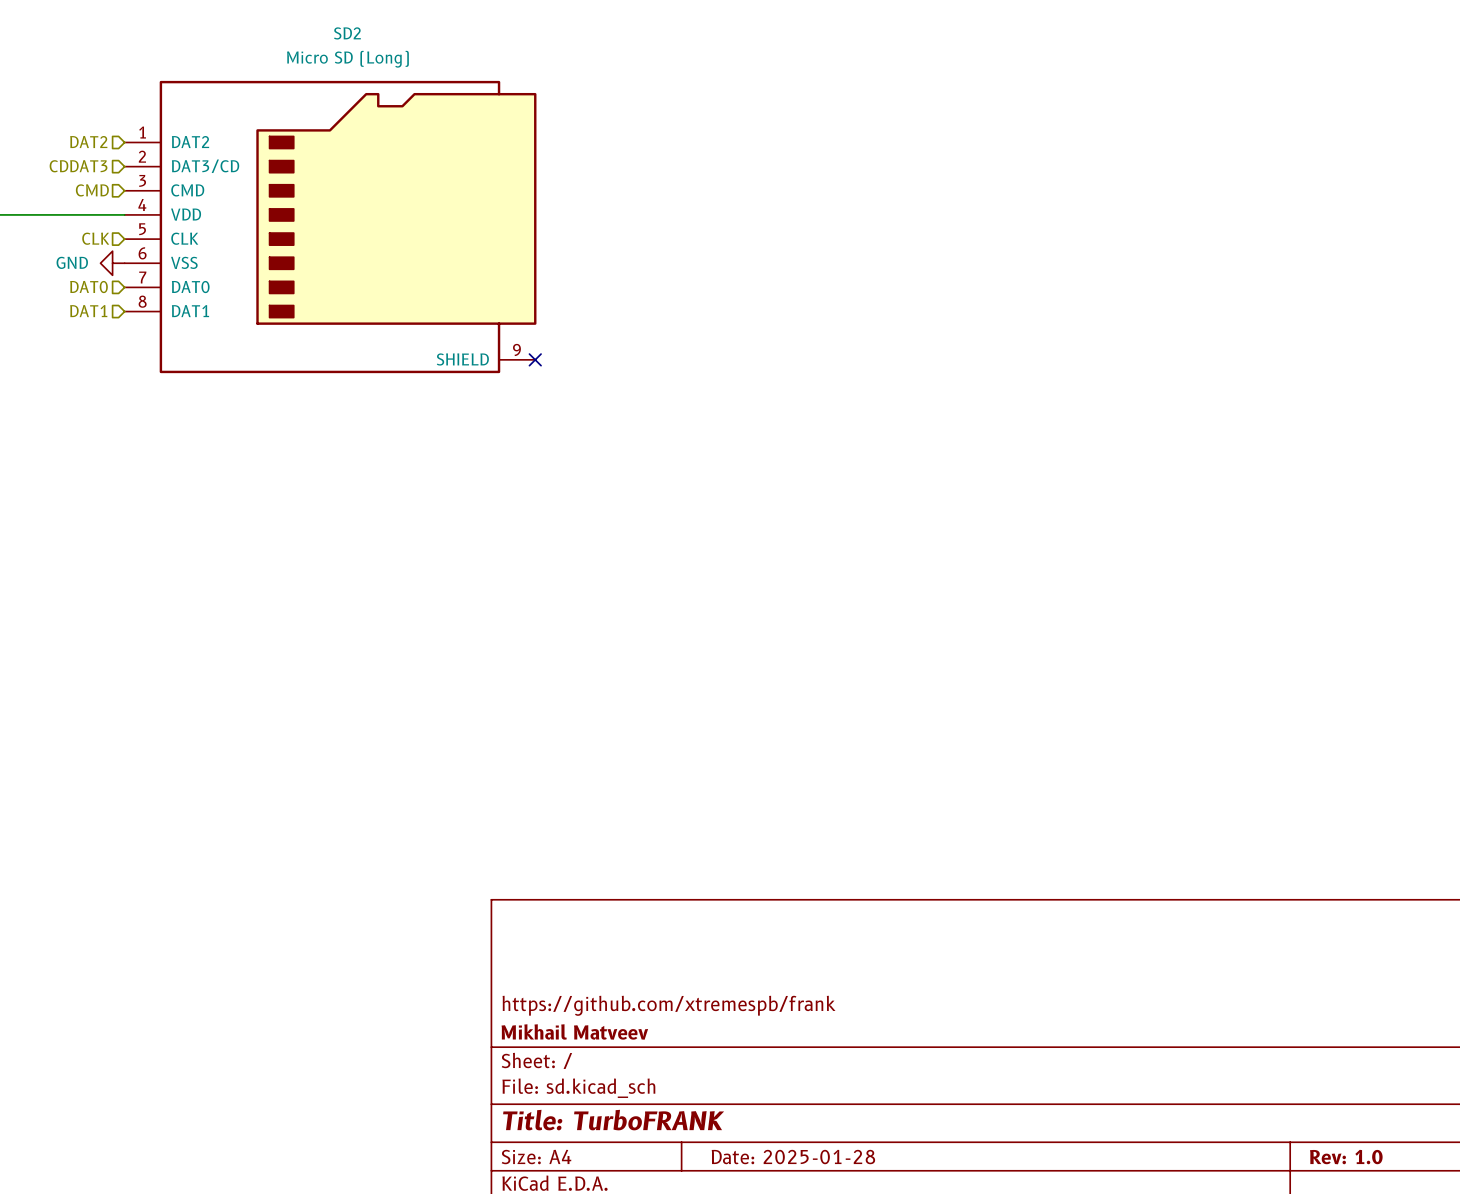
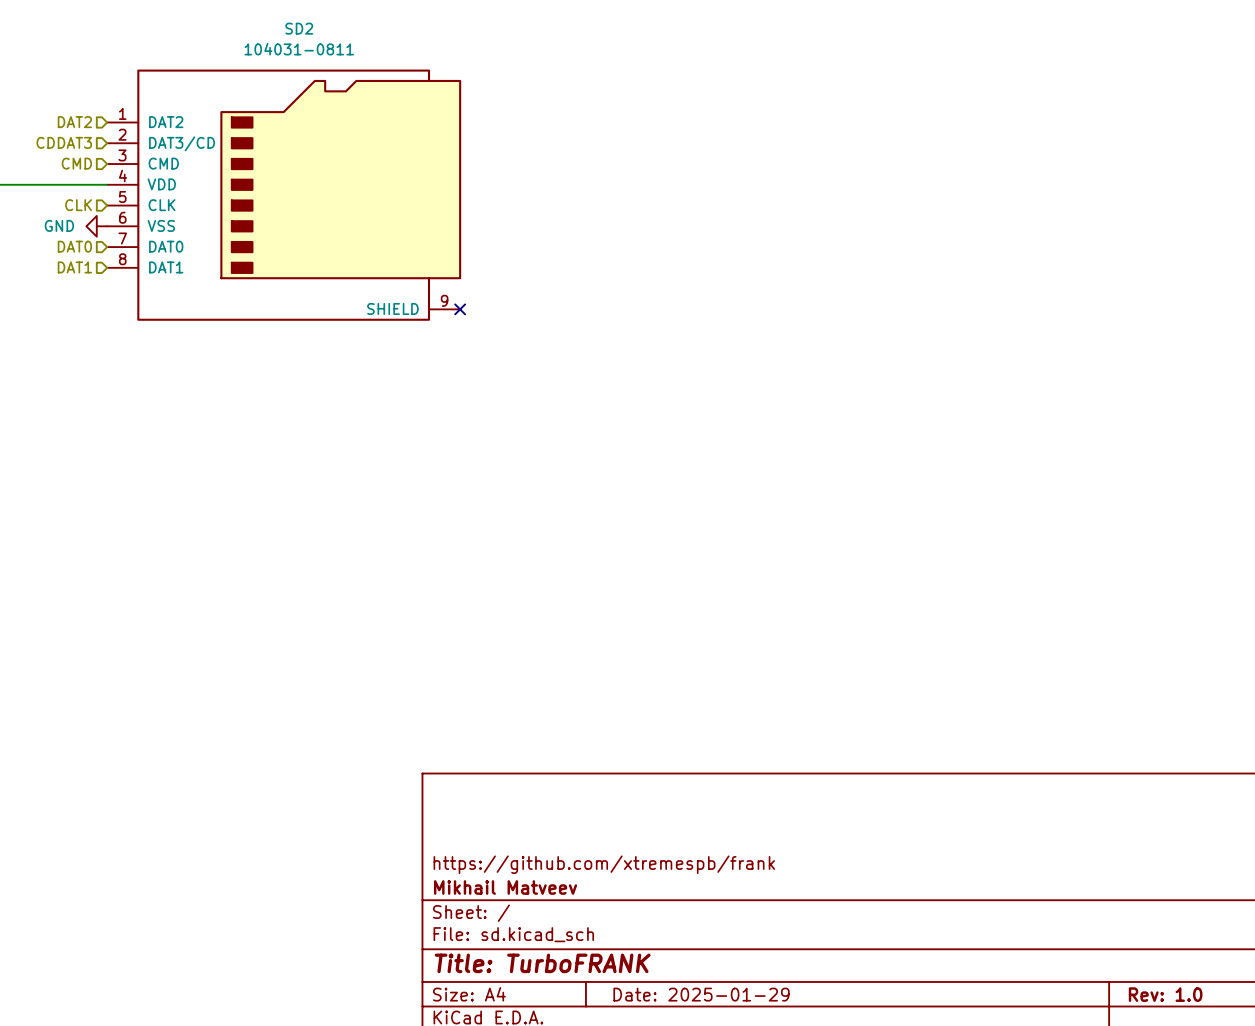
SD2 value: Micro SD (Long) (347, 59) -> 104031-0811 (299, 49)
title block: Date: 2025-01-28 (793, 1157) -> Date: 2025-01-29 (701, 994)

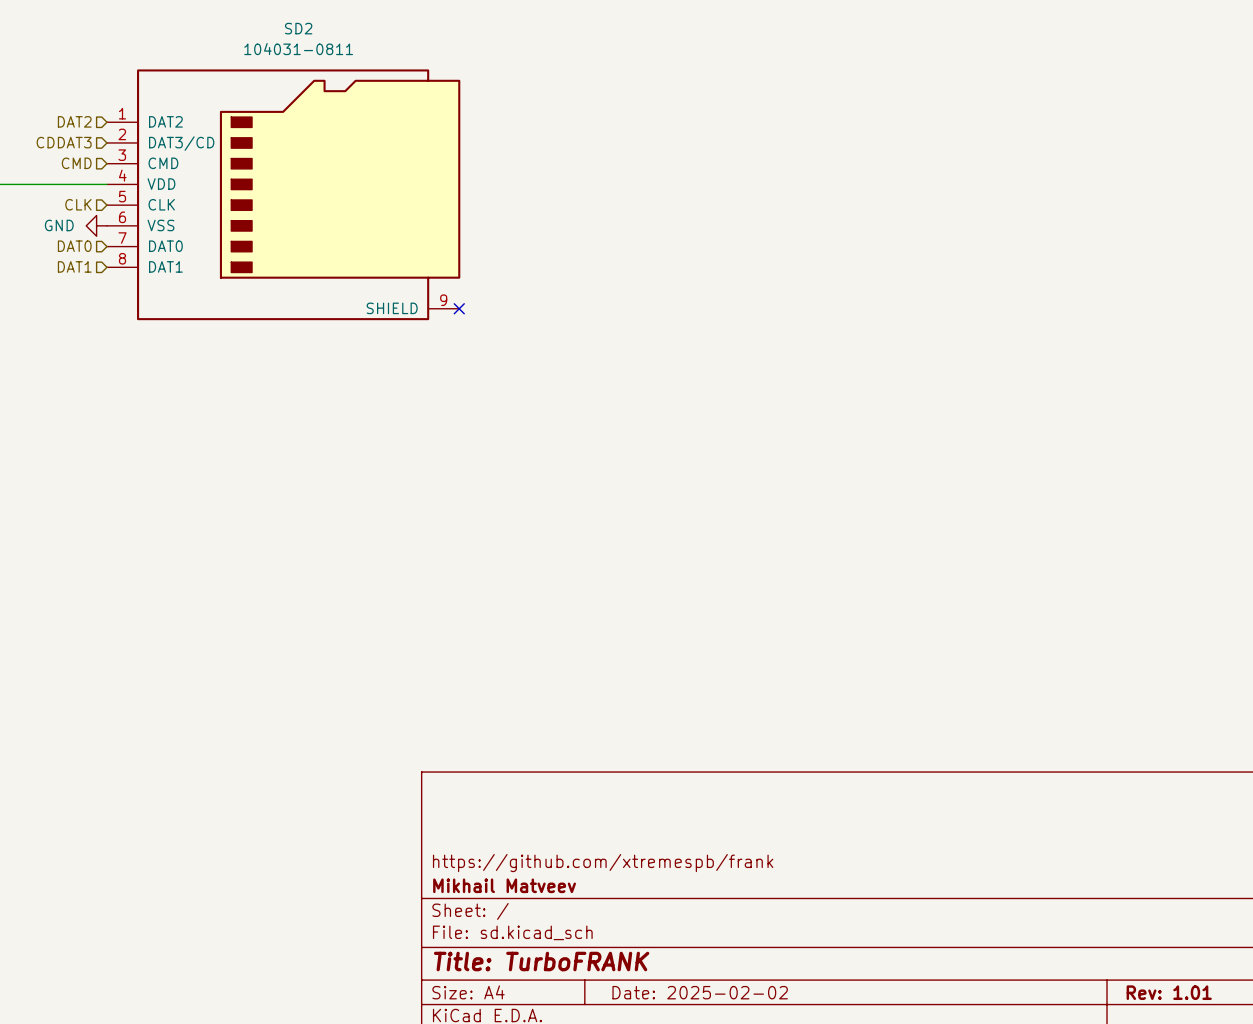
title block: Date: 2025-01-29 (701, 994) -> Date: 2025-02-02 (700, 992)
title block: Rev: 1.0 (1165, 994) -> Rev: 1.01 (1169, 992)

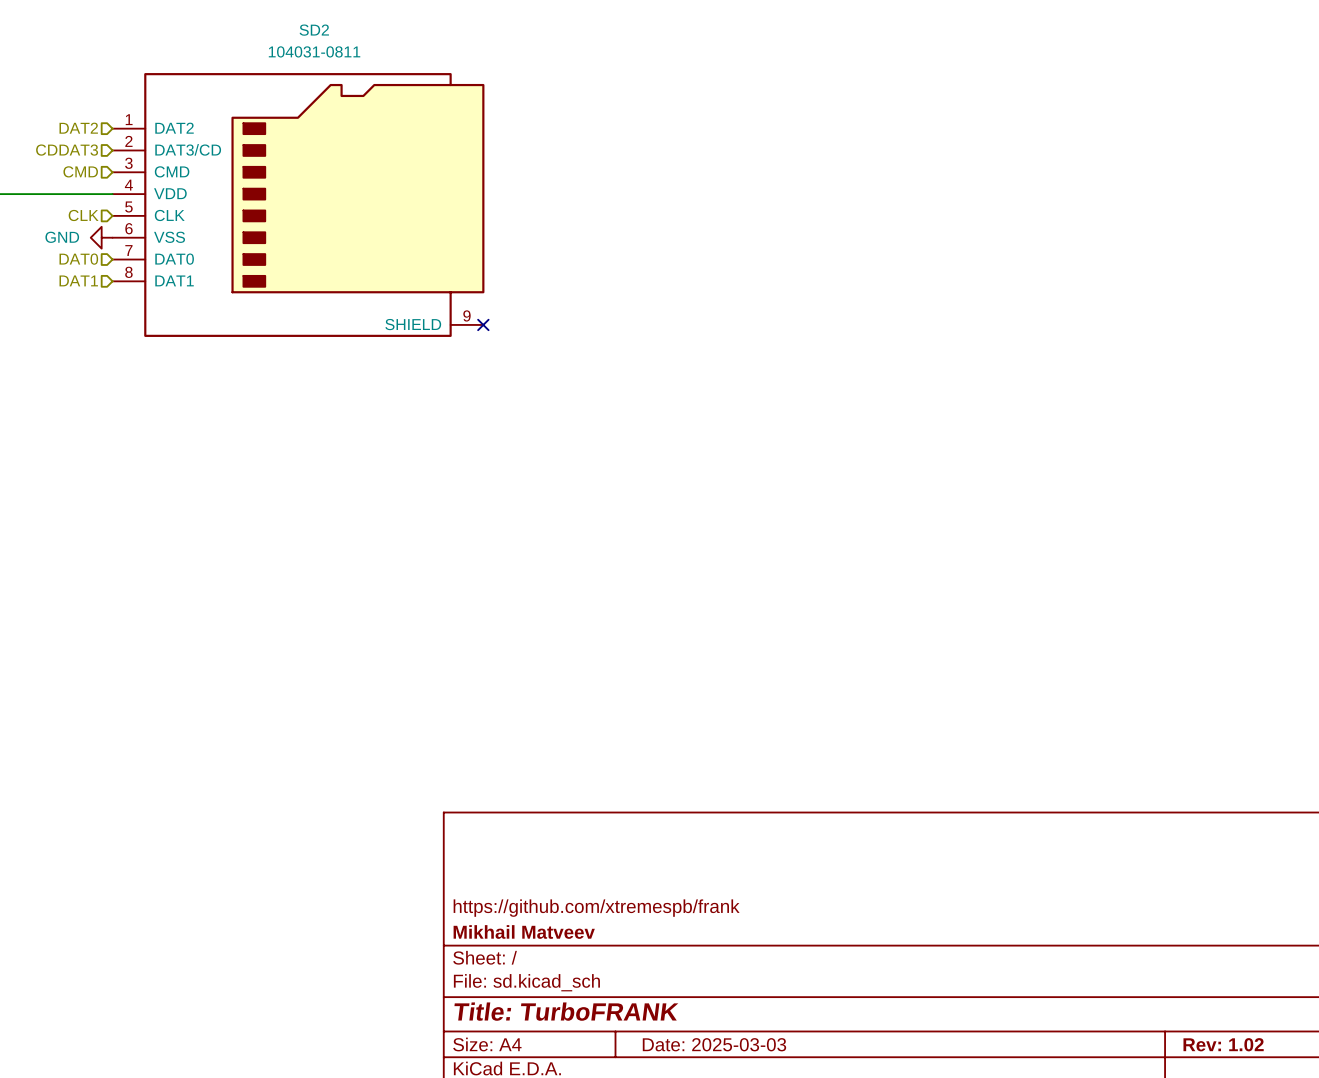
title block: Date: 2025-02-02 (700, 992) -> Date: 2025-03-03 (714, 1044)
title block: Rev: 1.01 (1169, 992) -> Rev: 1.02 (1223, 1044)

